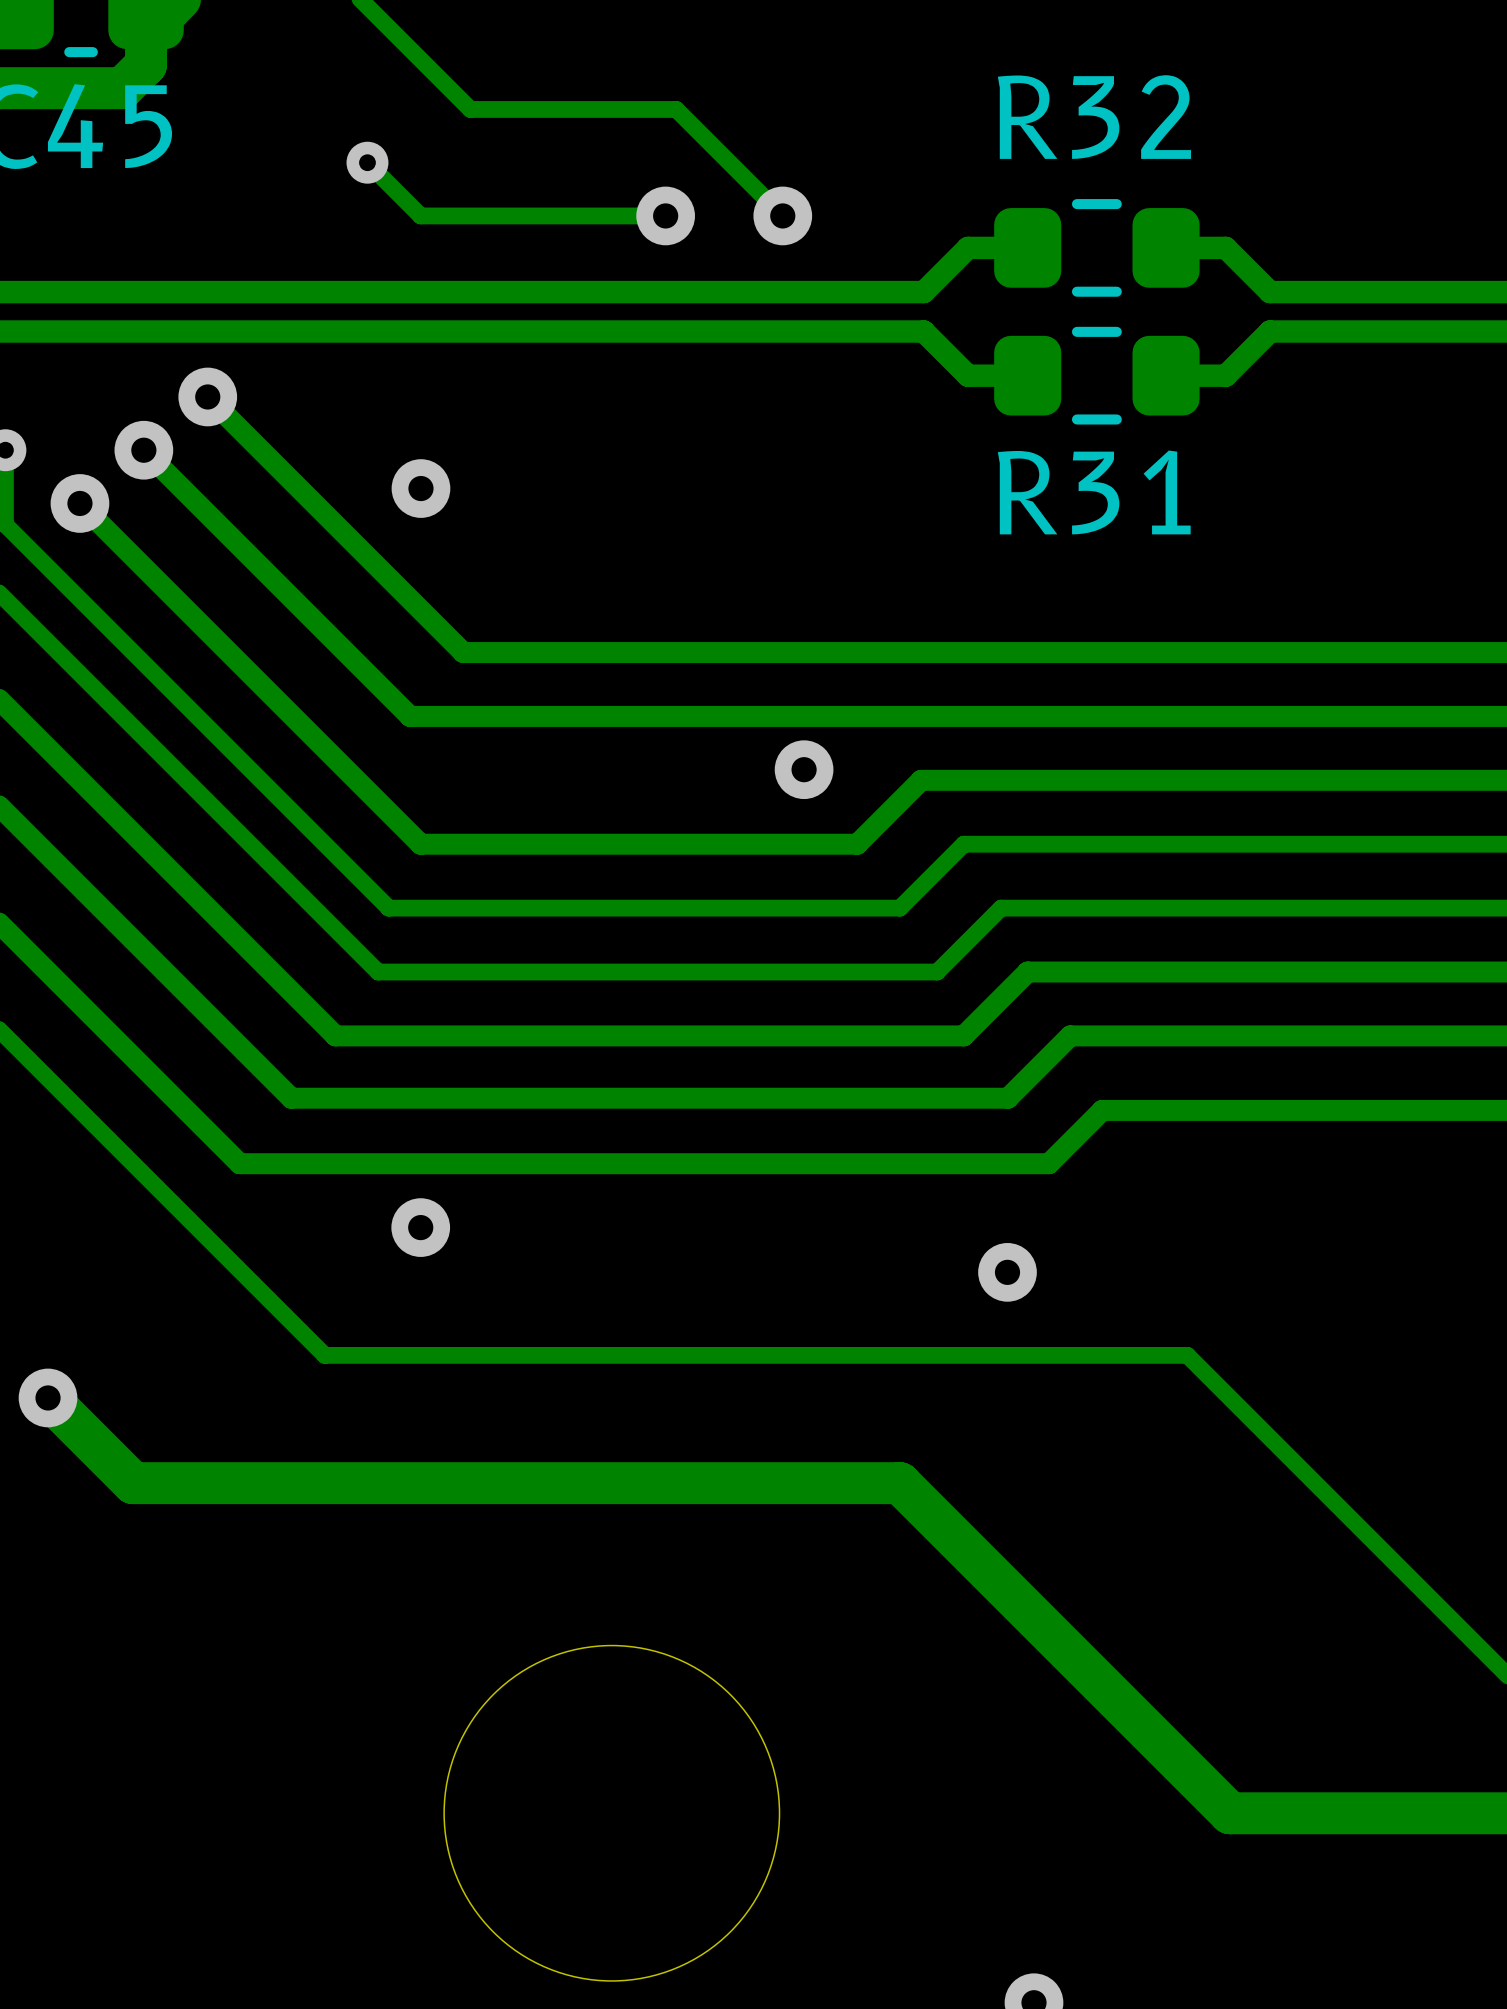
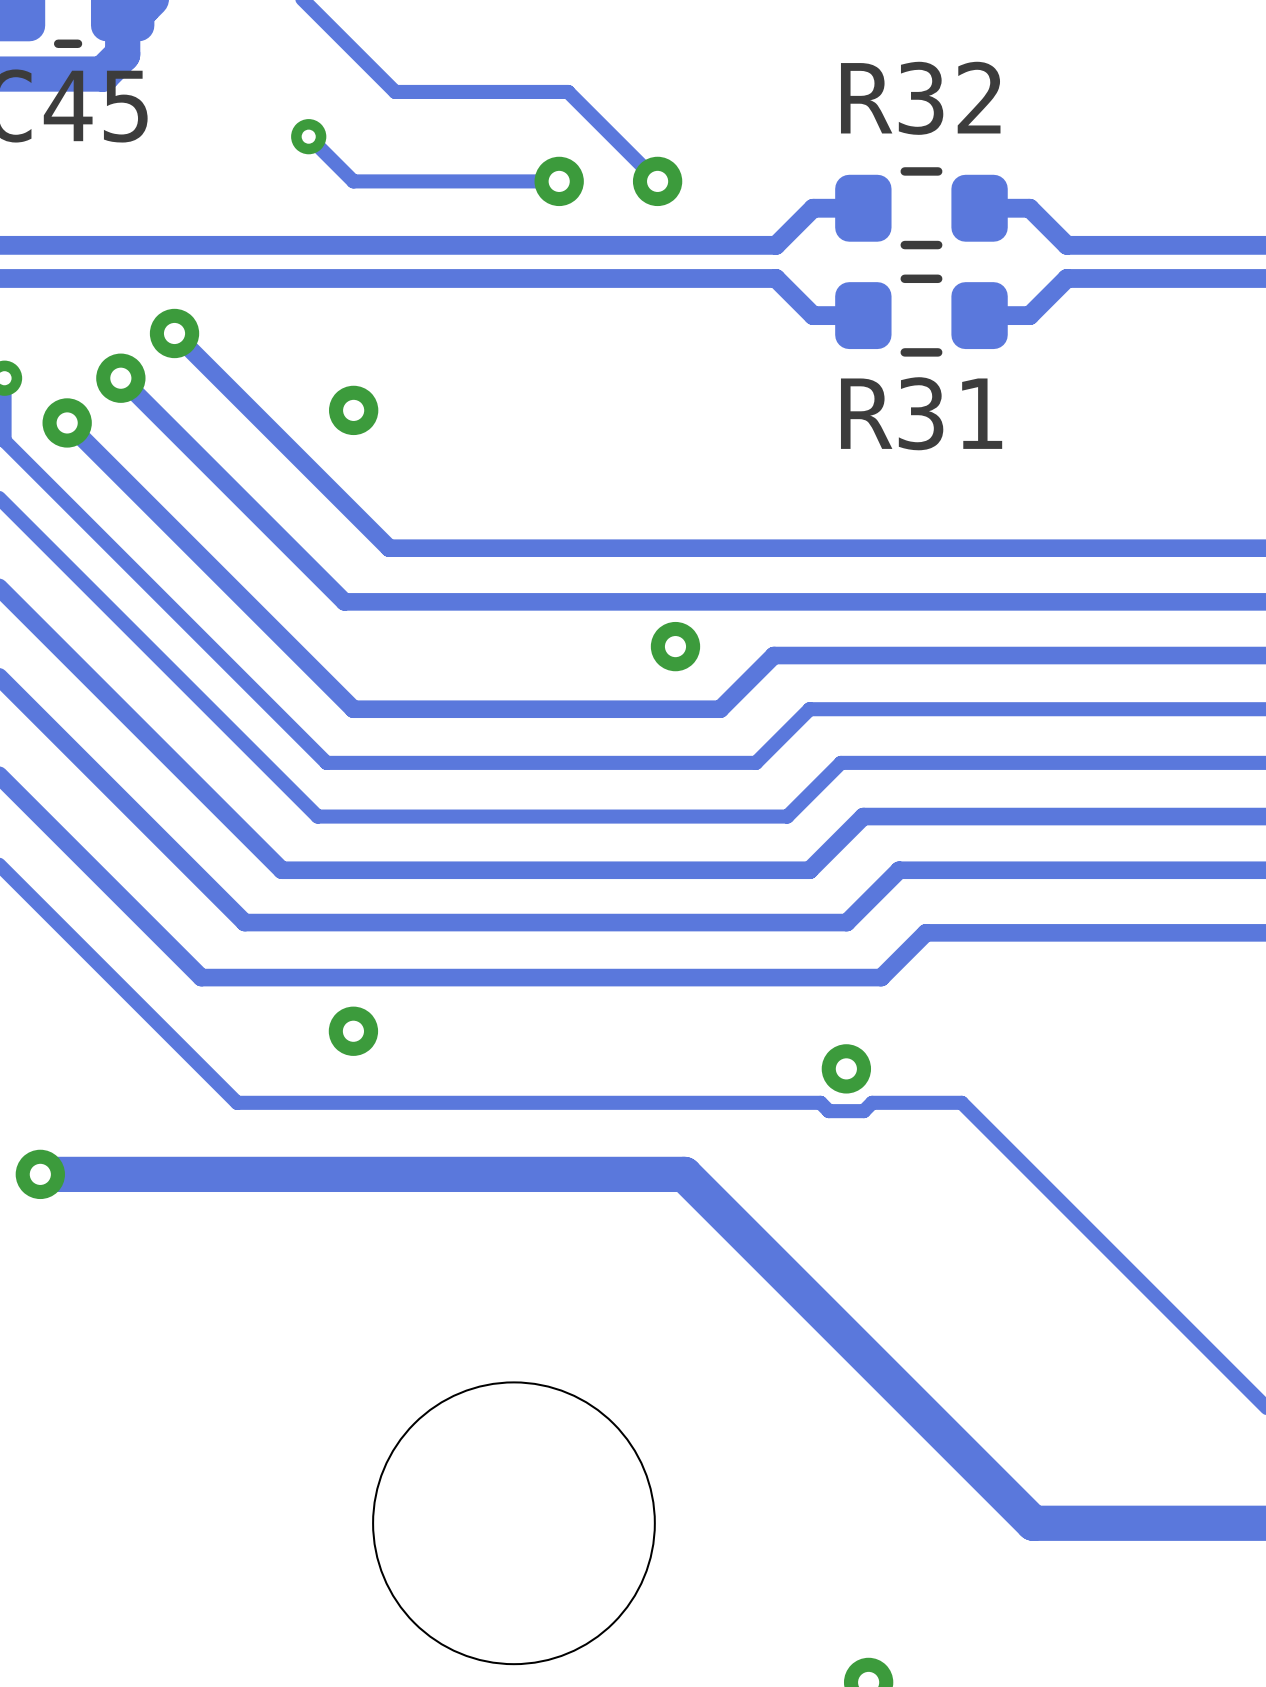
track: (282, 1312) (324, 1355) (1187, 1355) -> (237, 1102) (820, 1102) (828, 1111) (863, 1111) (872, 1102) (961, 1102) (997, 1138)
track: (48, 1397) (133, 1483) (899, 1483) -> (40, 1174) (684, 1174) (756, 1245)

